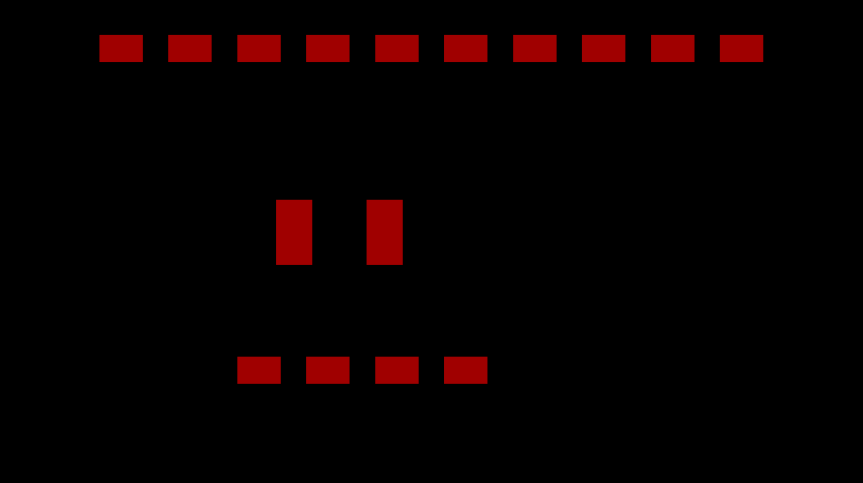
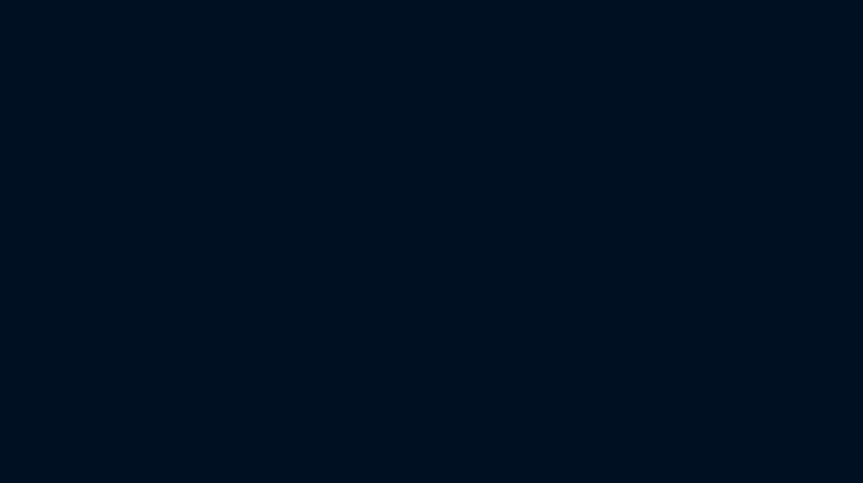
part: (155, 48) -> none
part: (293, 48) -> none
part: (431, 48) -> none
part: (569, 48) -> none
part: (707, 48) -> none
part: (339, 232) -> none
part: (293, 370) -> none
part: (431, 370) -> none

